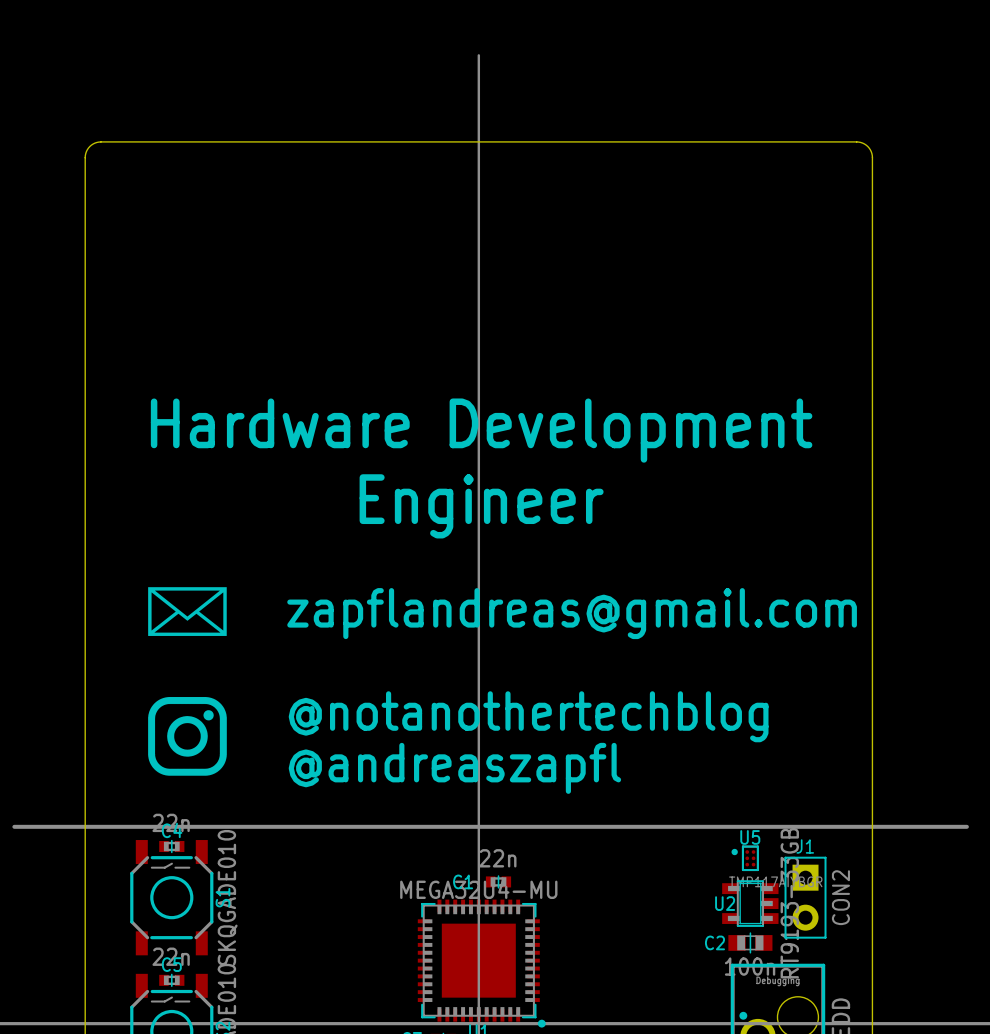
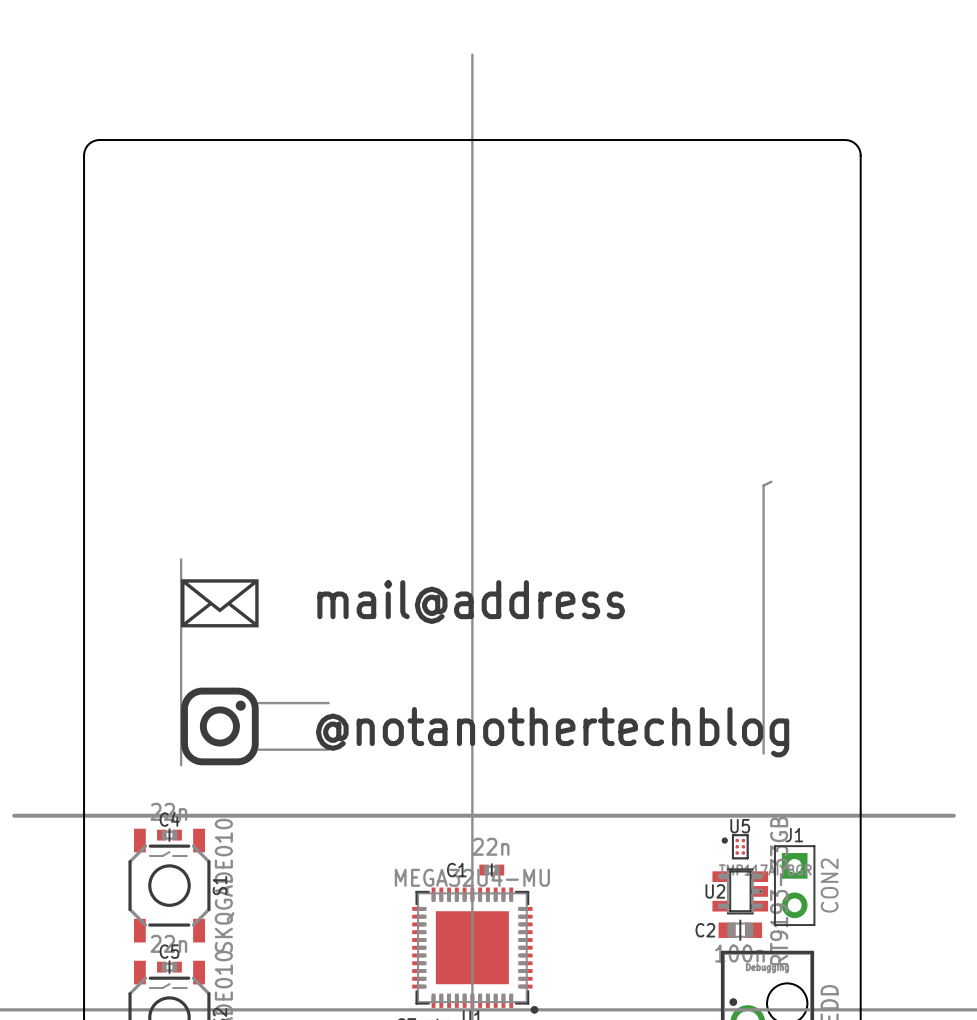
text: Hardware Development (481, 430) -> none
line: none -> (771, 481) (763, 485) (763, 753)
text: Engineer (481, 506) -> none
line: none -> (181, 559) (181, 765)
text: none -> mail@address (471, 602)
drawing position: (187, 611) -> (219, 603)
text: zapflandreas@gmail.com (572, 613) -> none
line: none -> (258, 703) (328, 703)
text position: @notanothertechblog (528, 716) -> @notanothertechblog (552, 732)
drawing position: (187, 736) -> (219, 726)
line: none -> (258, 749) (328, 749)
text: @andreaszapfl (454, 768) -> none

